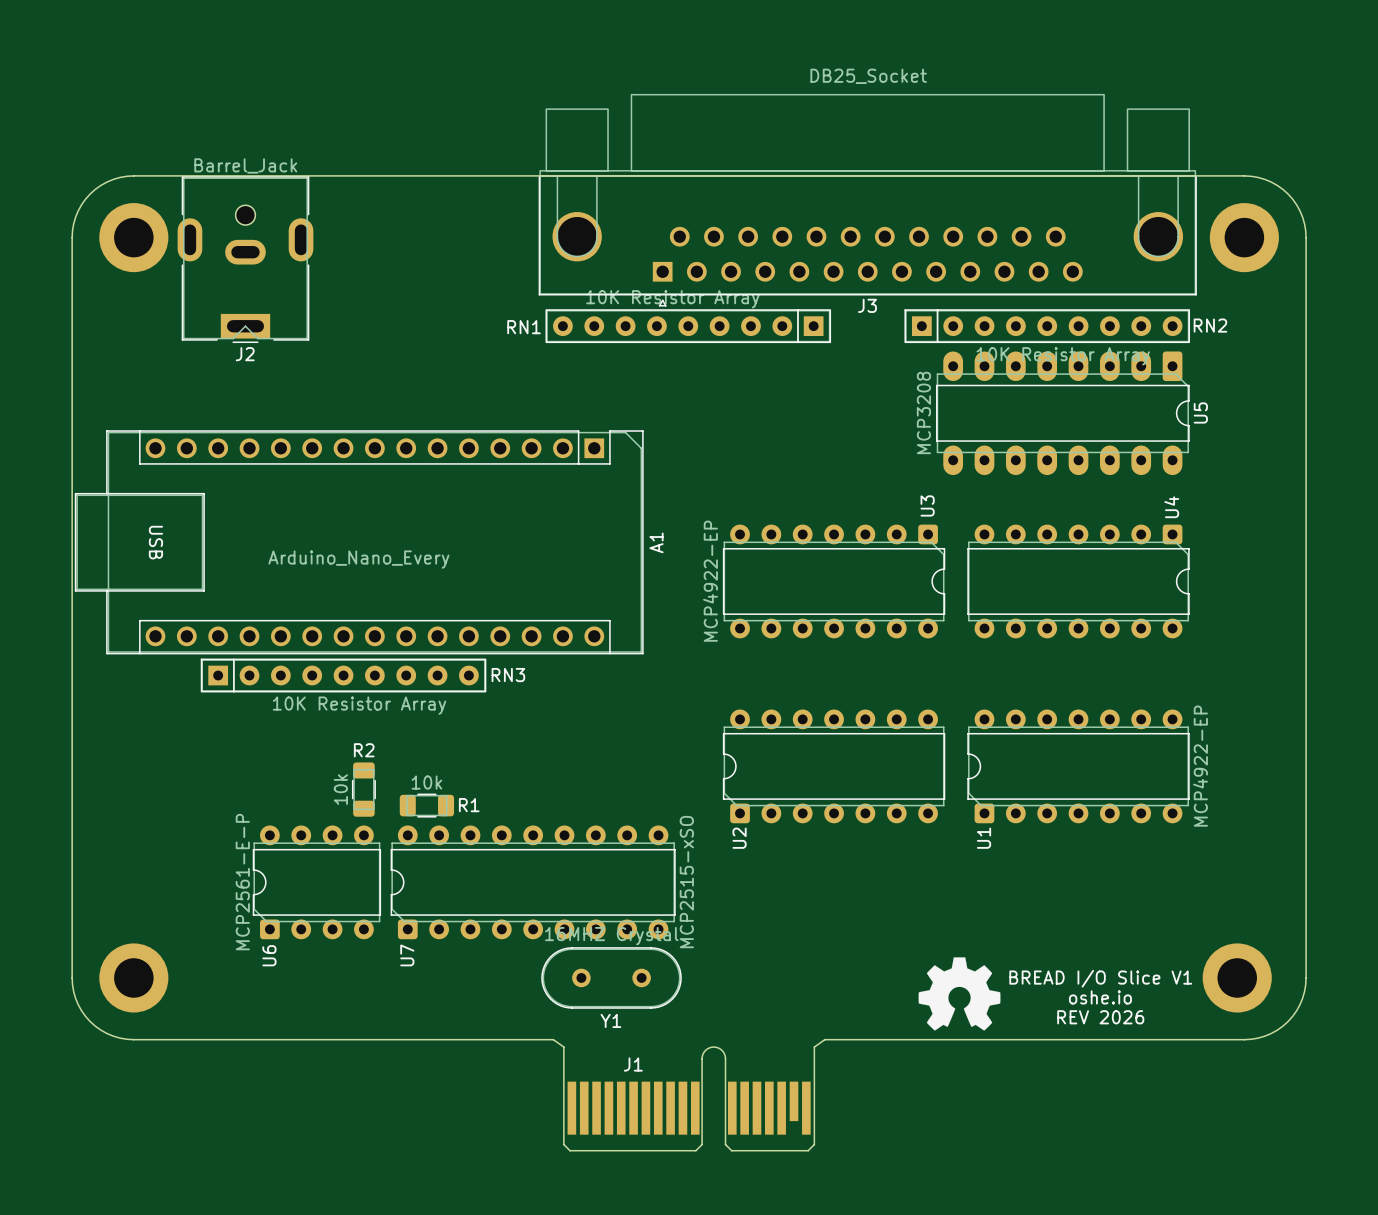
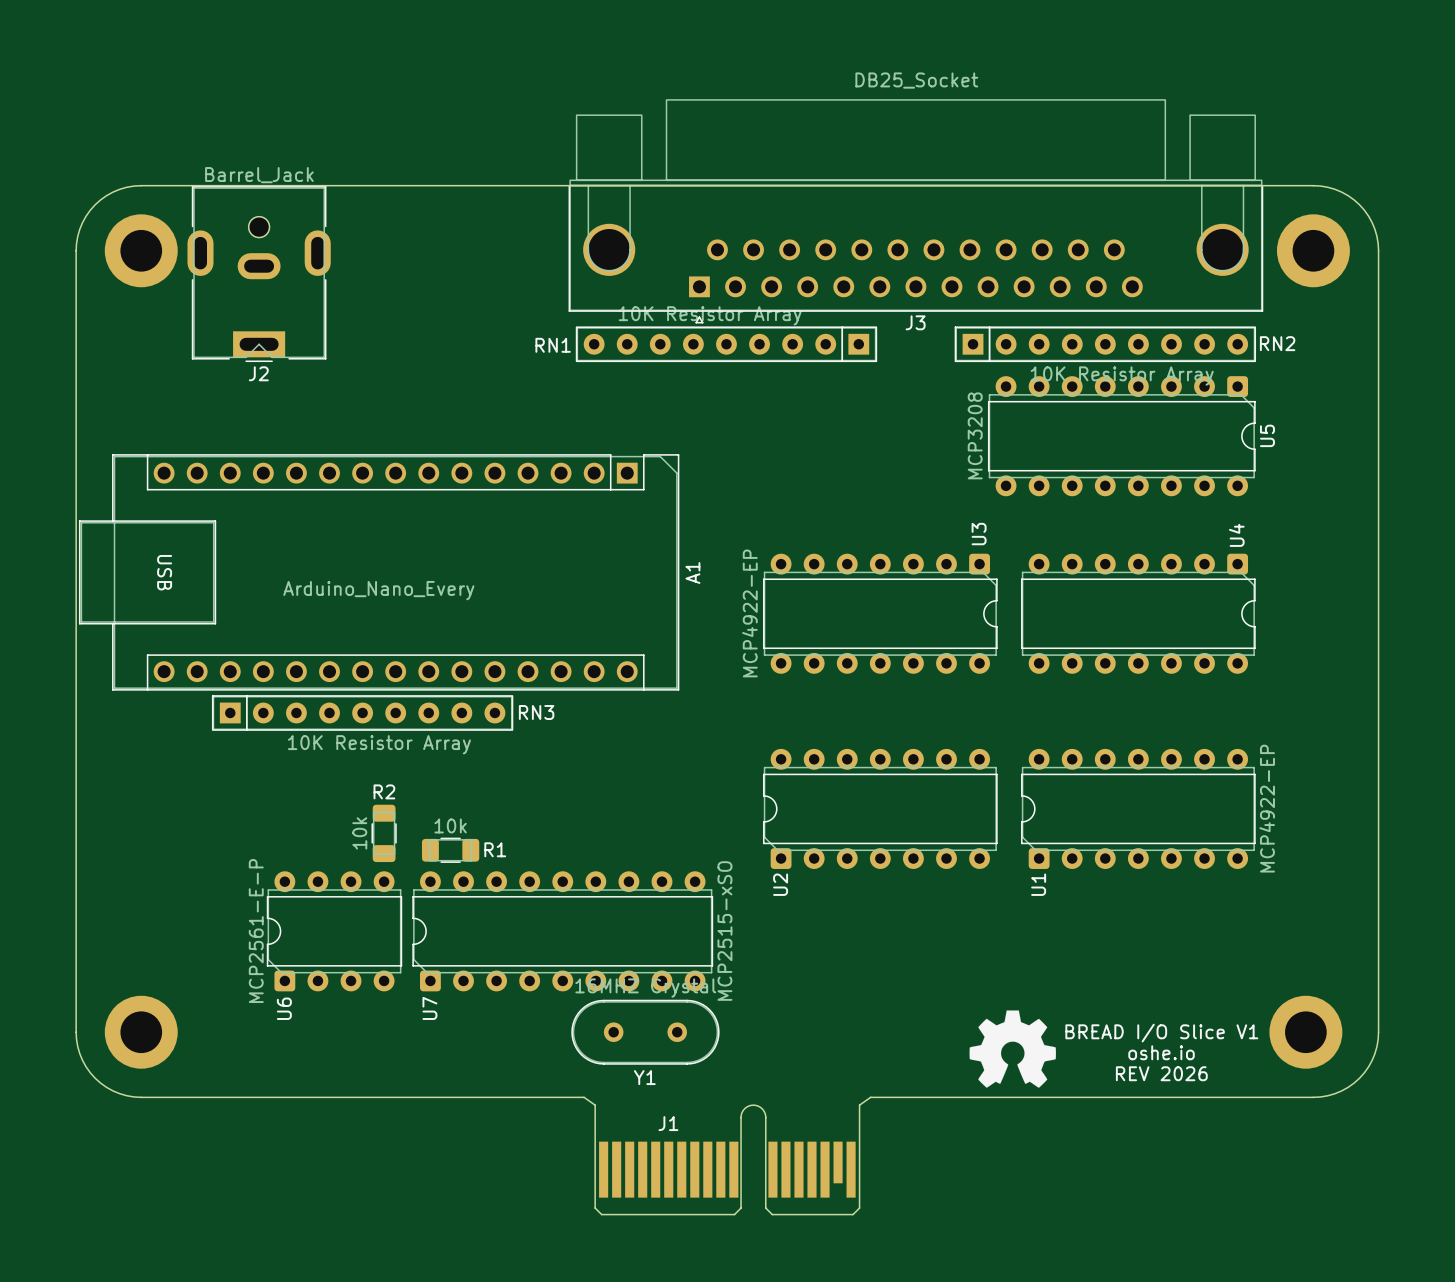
U5 footprint: [935, 351, 1190, 476] -> [987, 376, 1256, 497]

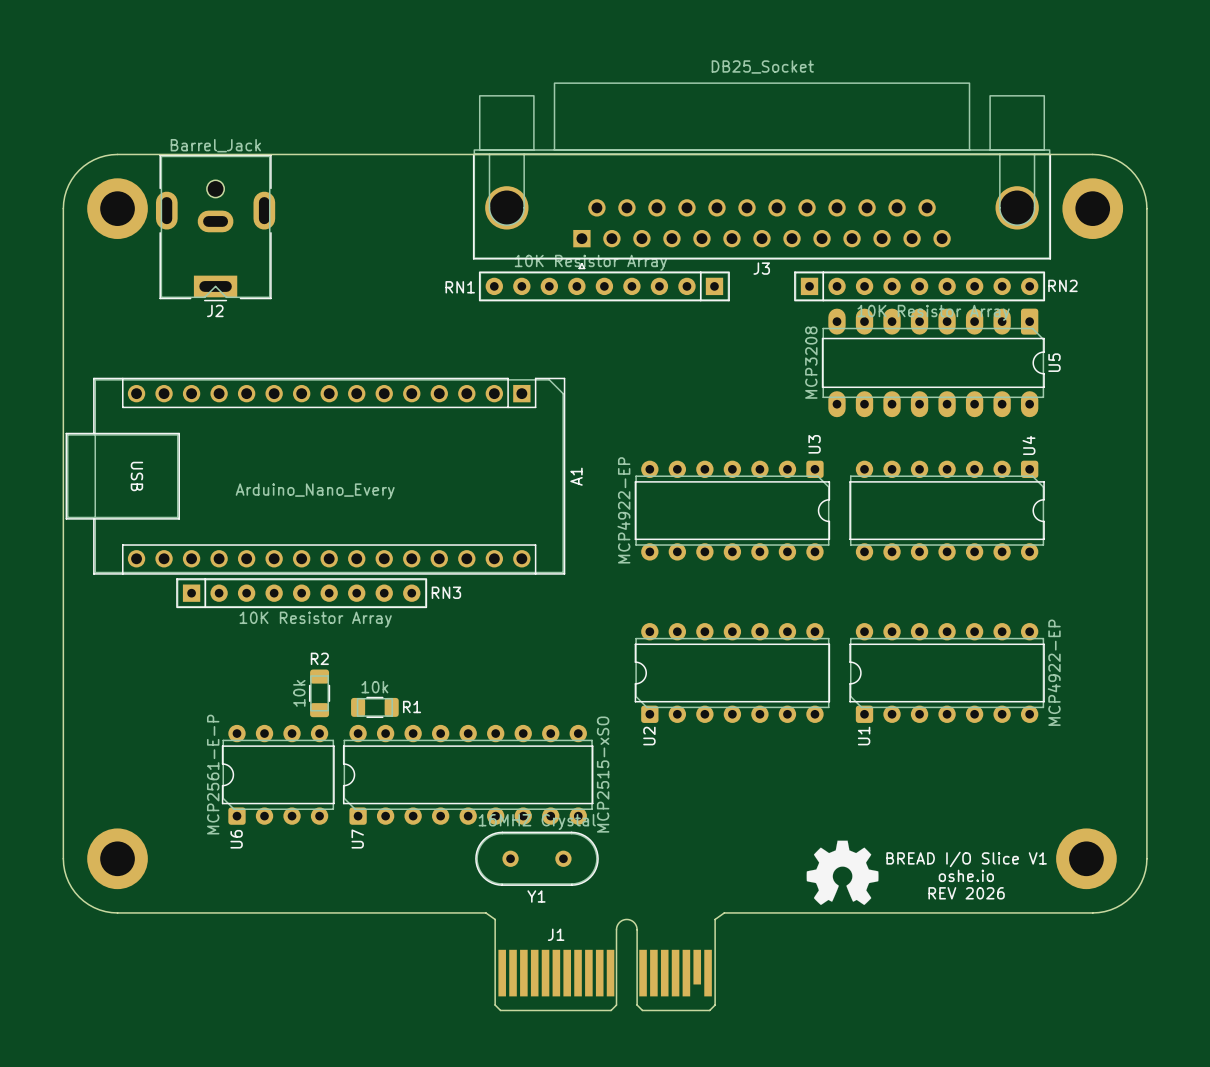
U5 footprint: [987, 376, 1256, 497] -> [821, 308, 1045, 418]

